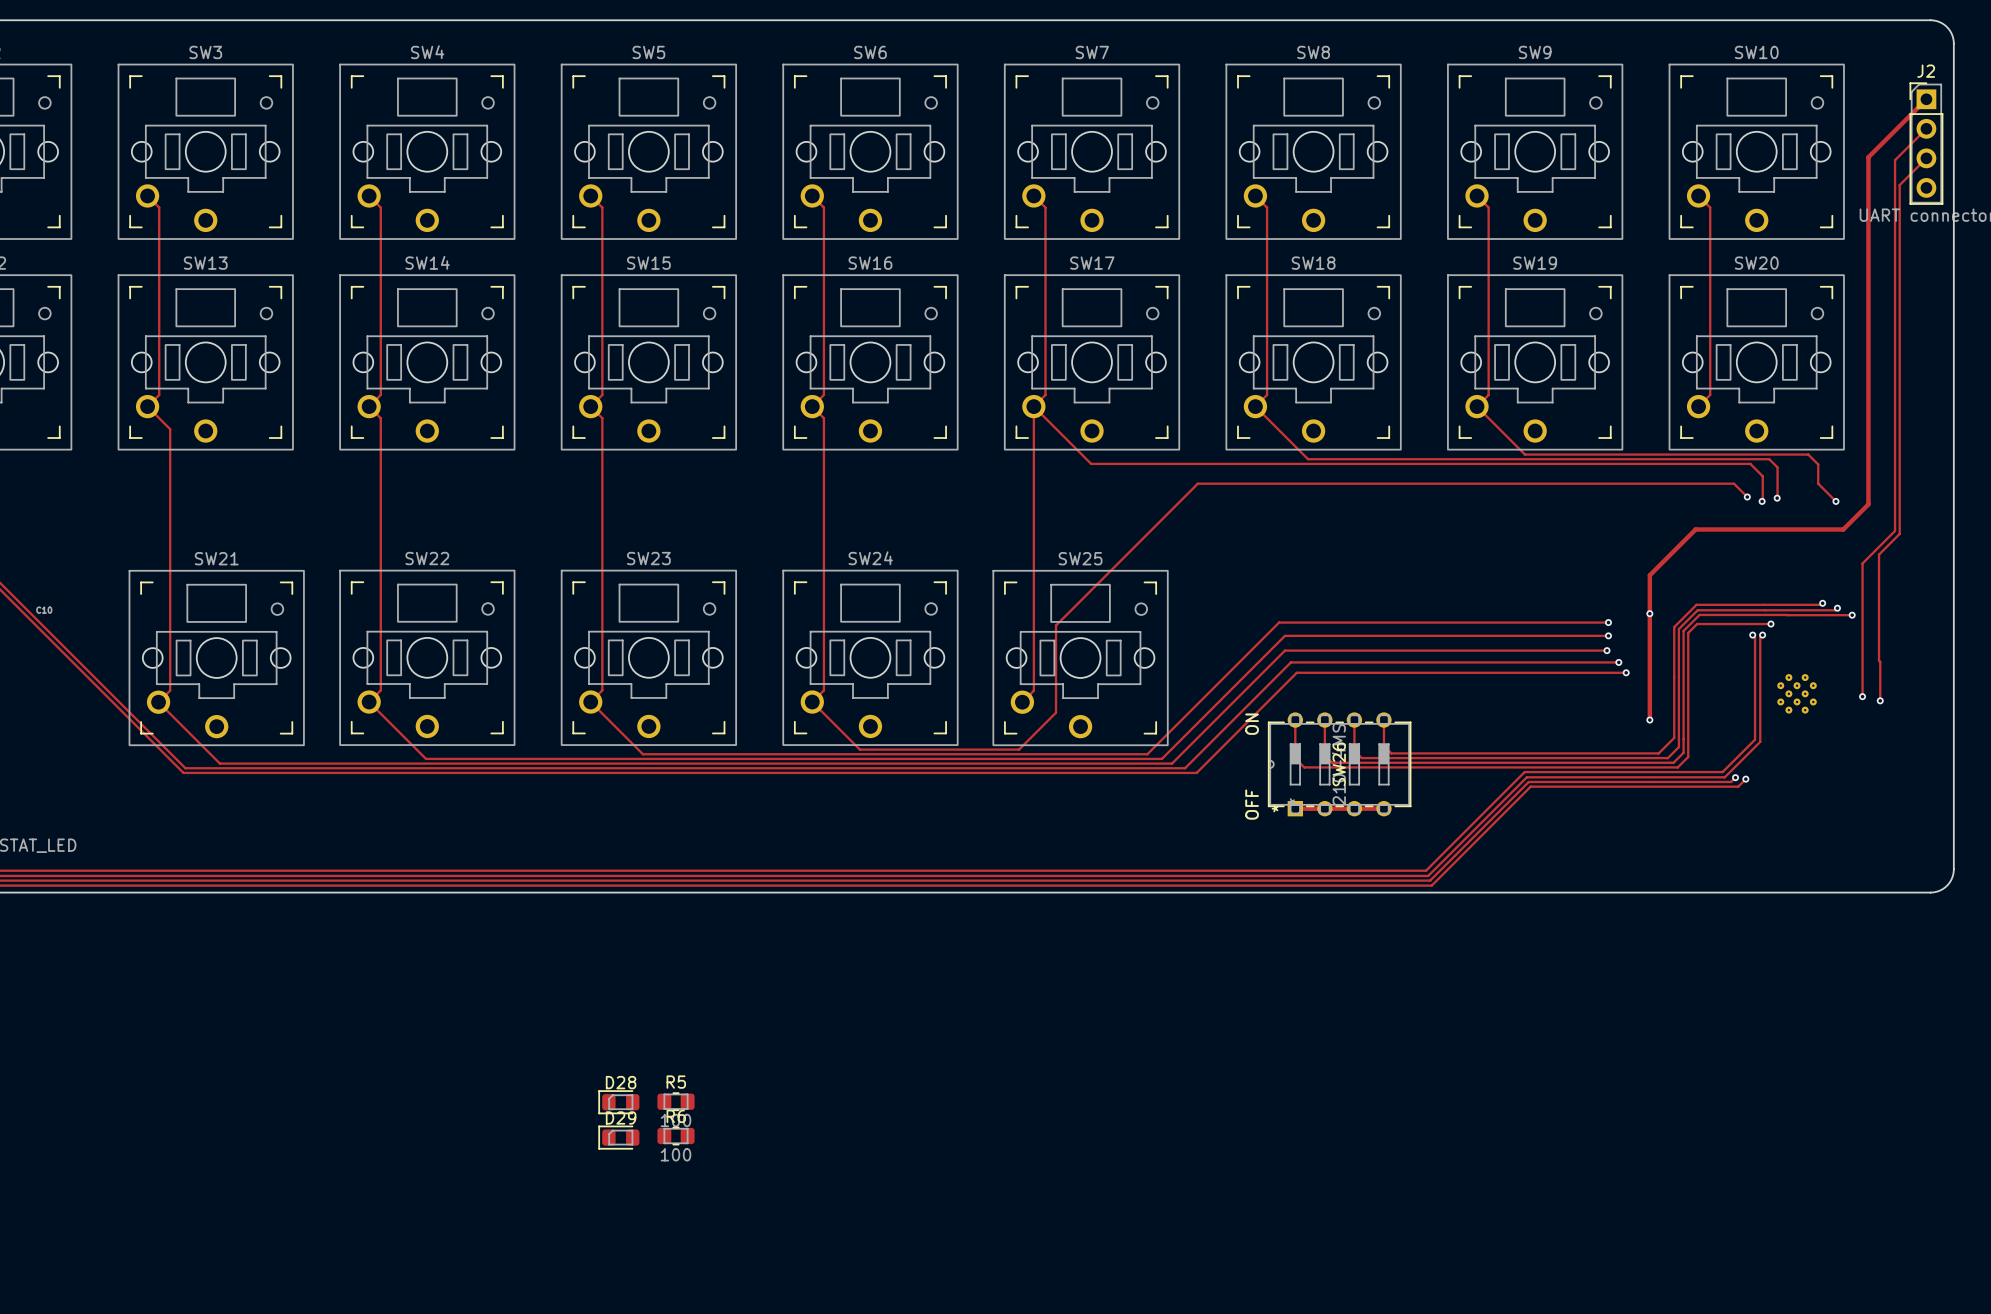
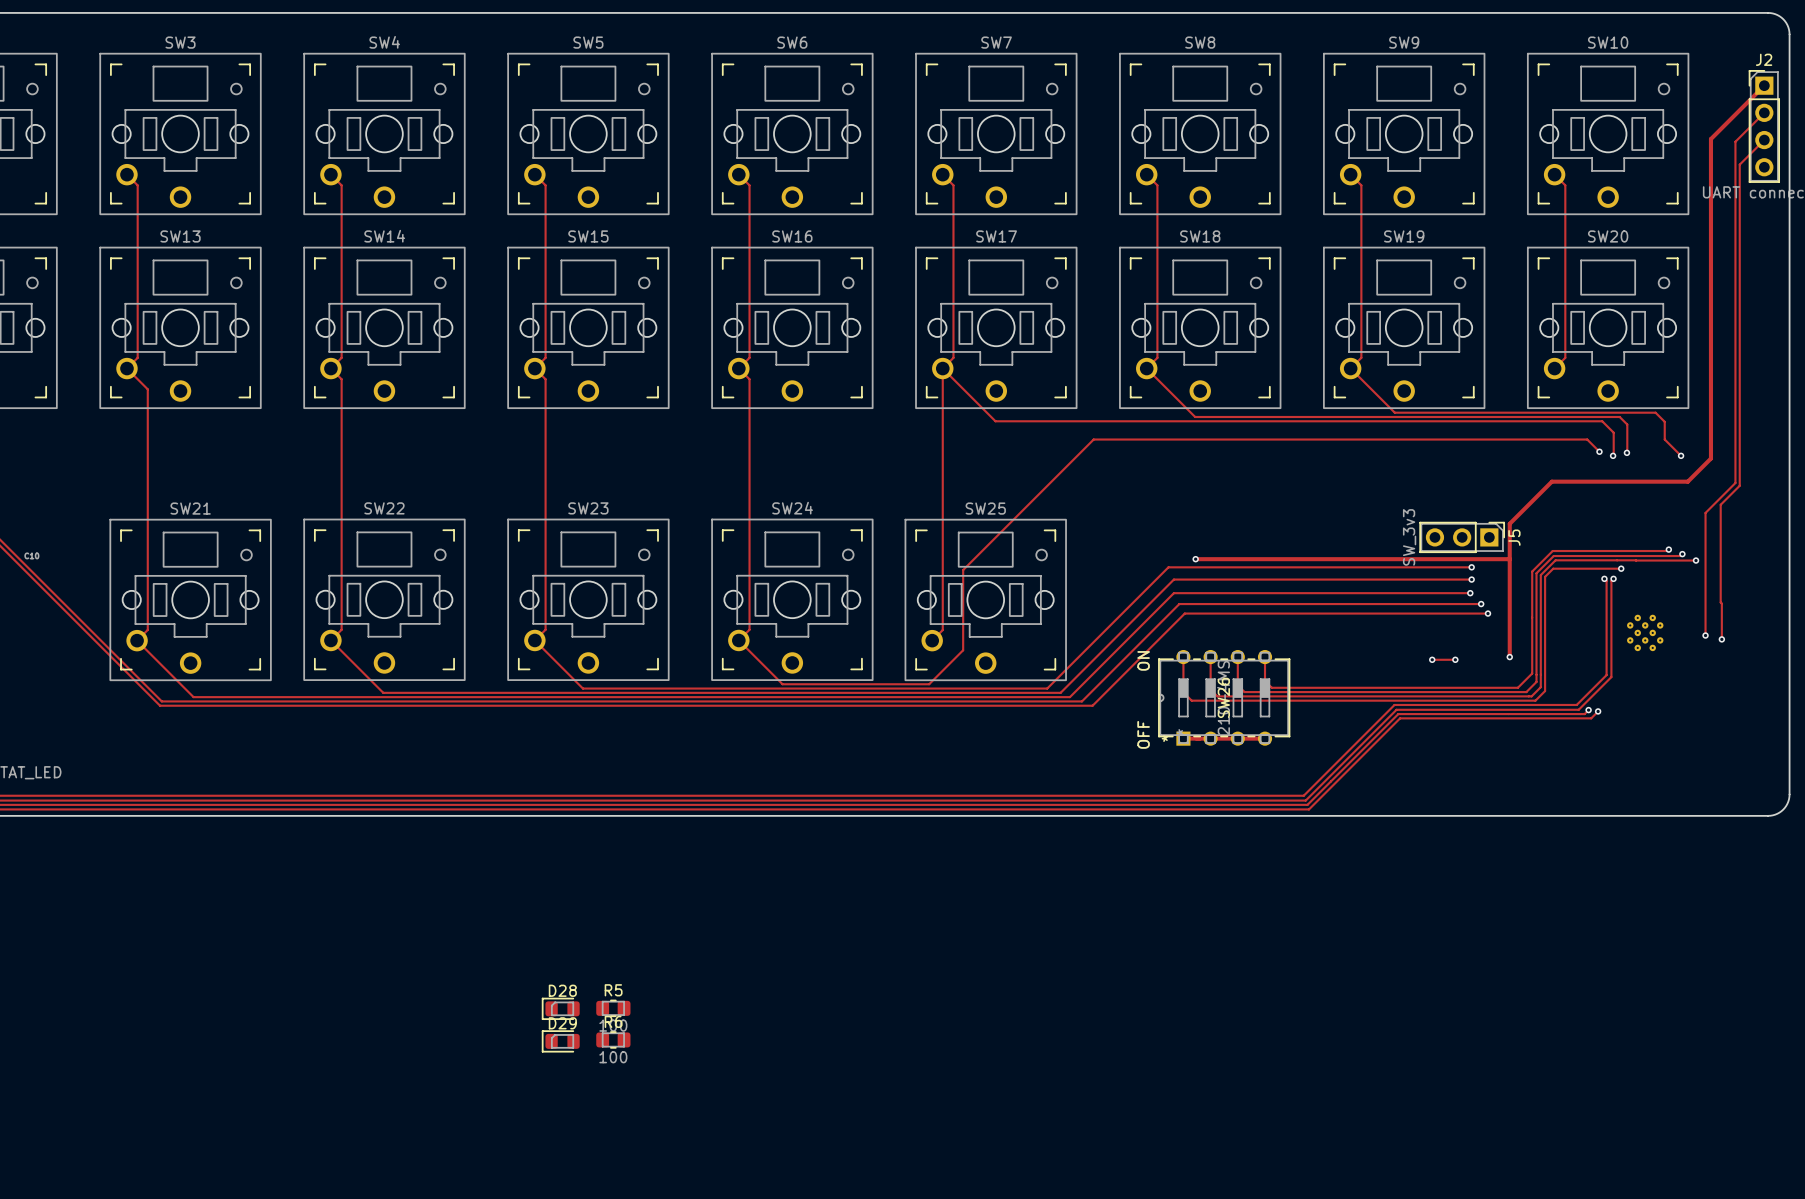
J5: none -> SW_3v3 (1462, 537)
track: none -> (1195, 559) (1509, 559)
via: none -> (1195, 559)
via: (1649, 613) -> none
track: none -> (1432, 659) (1455, 659)
via: none -> (1432, 659)
via: none -> (1455, 659)

